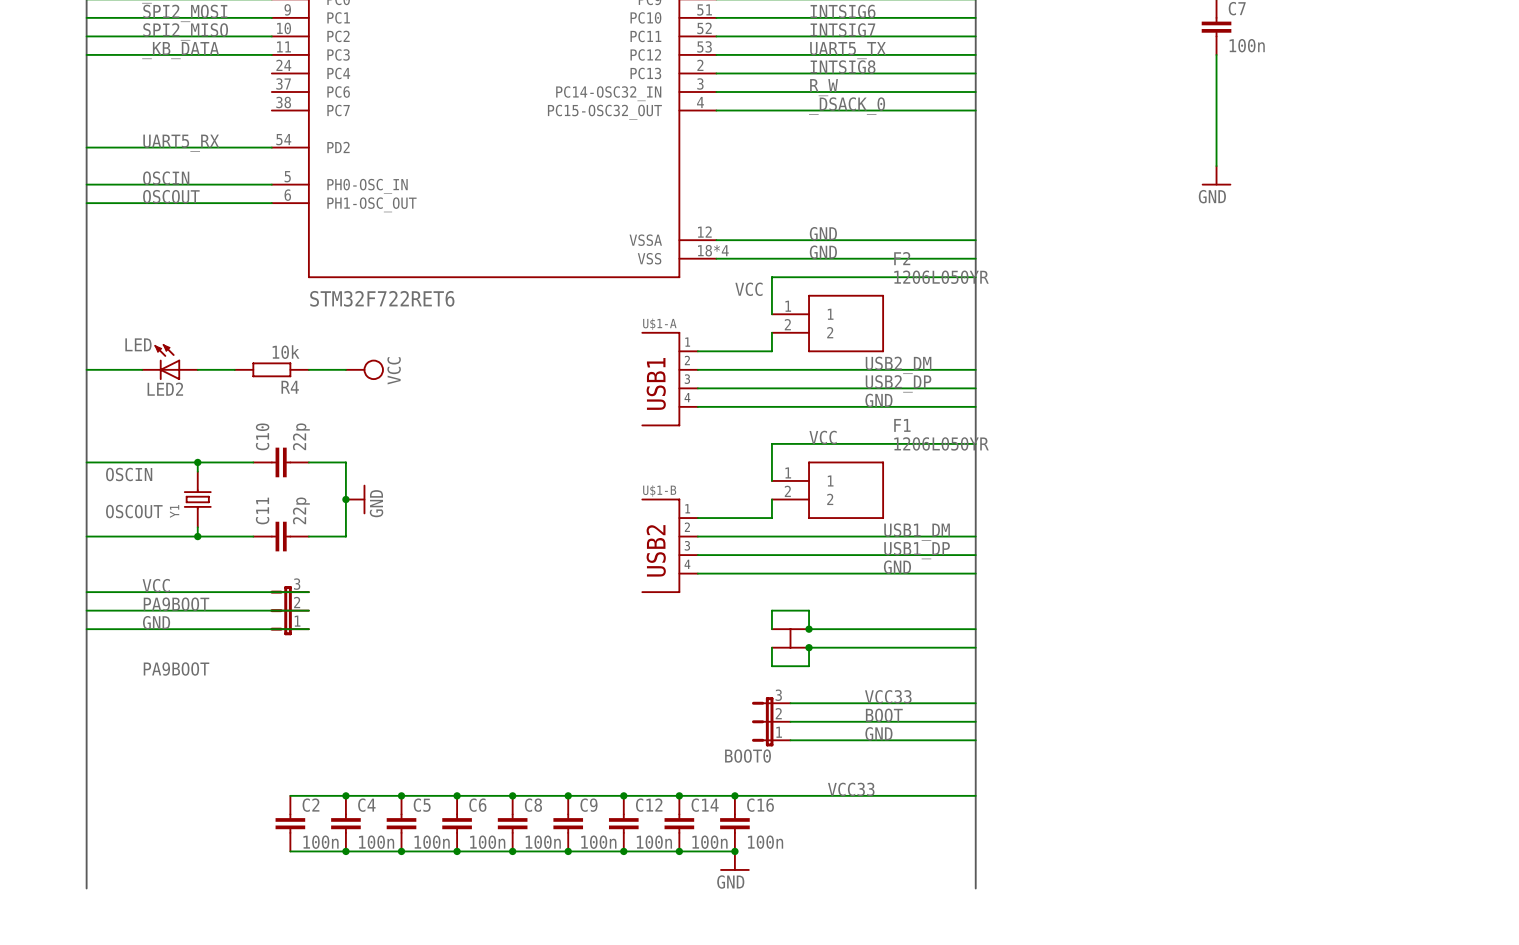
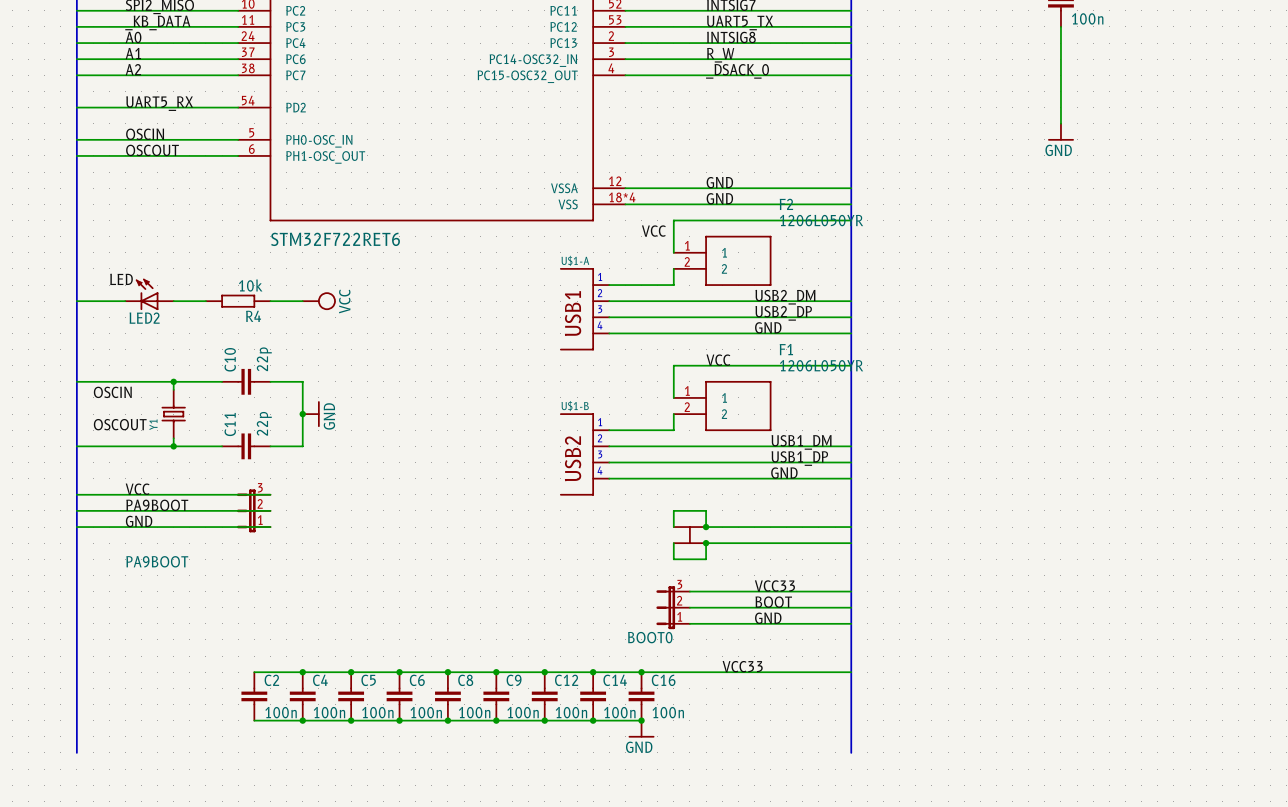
label: none -> A0 (133, 37)
wire: none -> (76, 43) (238, 43)
label: none -> A1 (133, 53)
wire: none -> (76, 59) (238, 59)
label: none -> A2 (133, 69)
wire: none -> (76, 75) (238, 75)

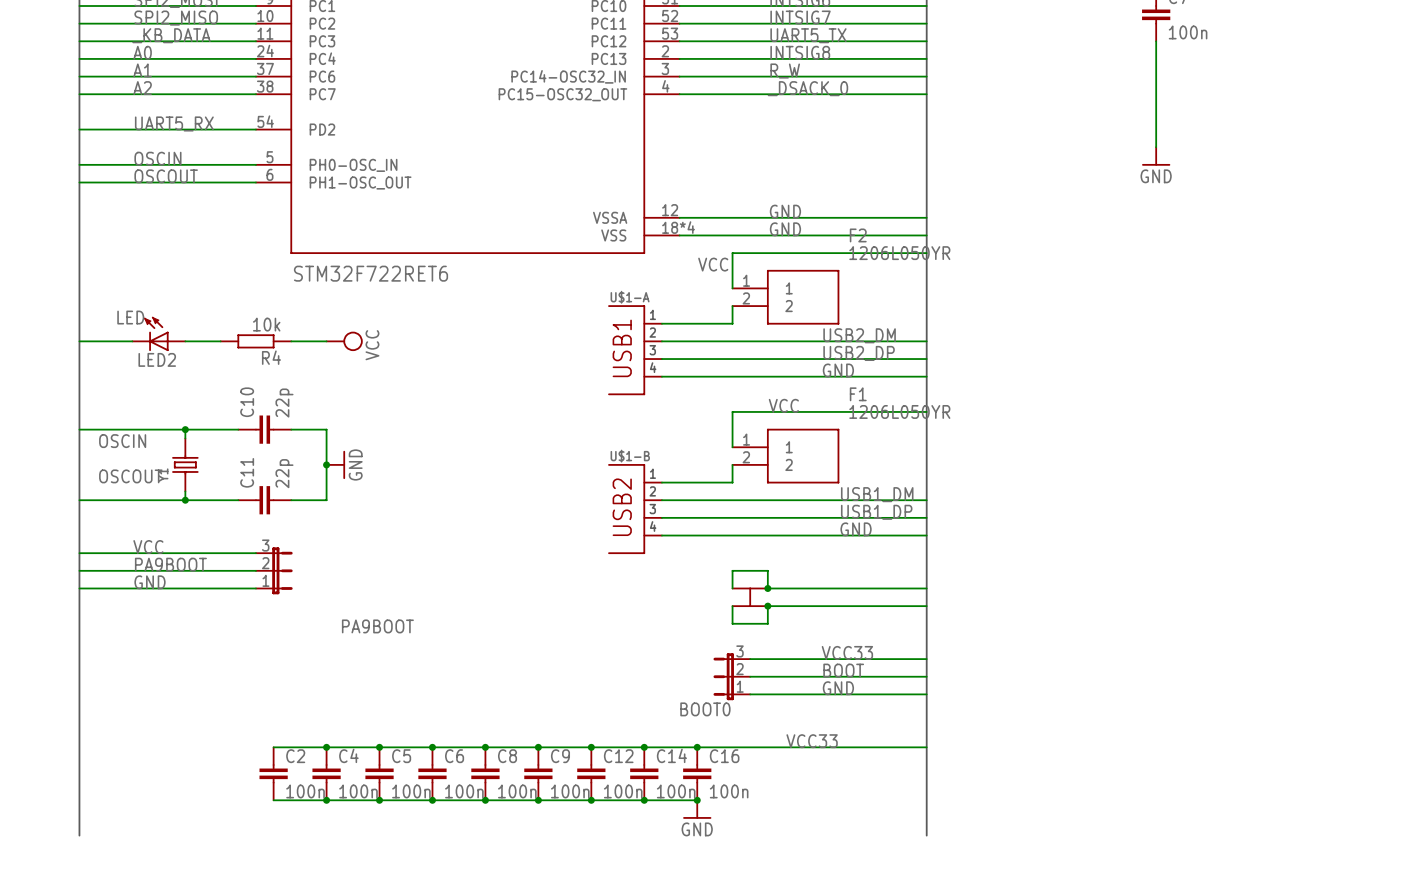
PA9BOOT flip: as is (246, 510) -> left-right (282, 570)

